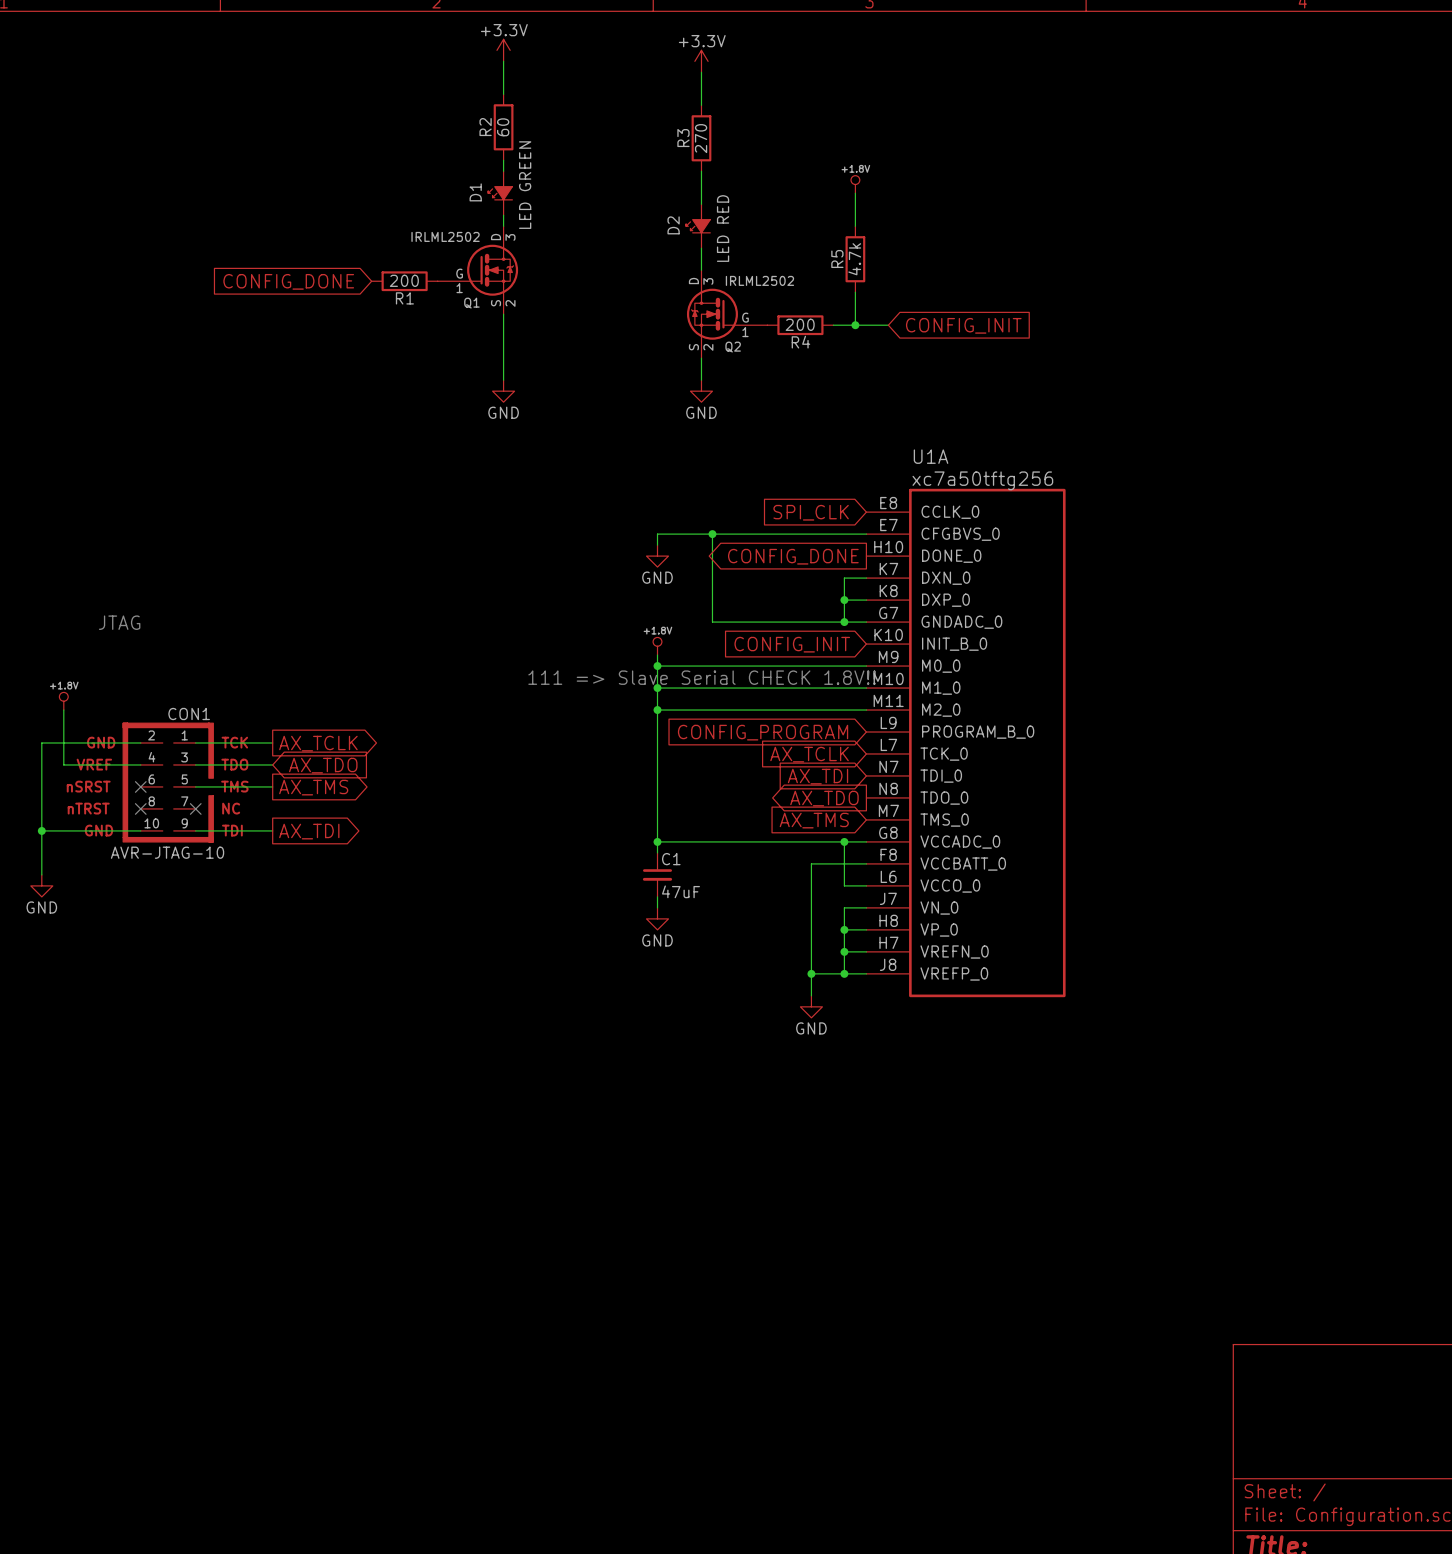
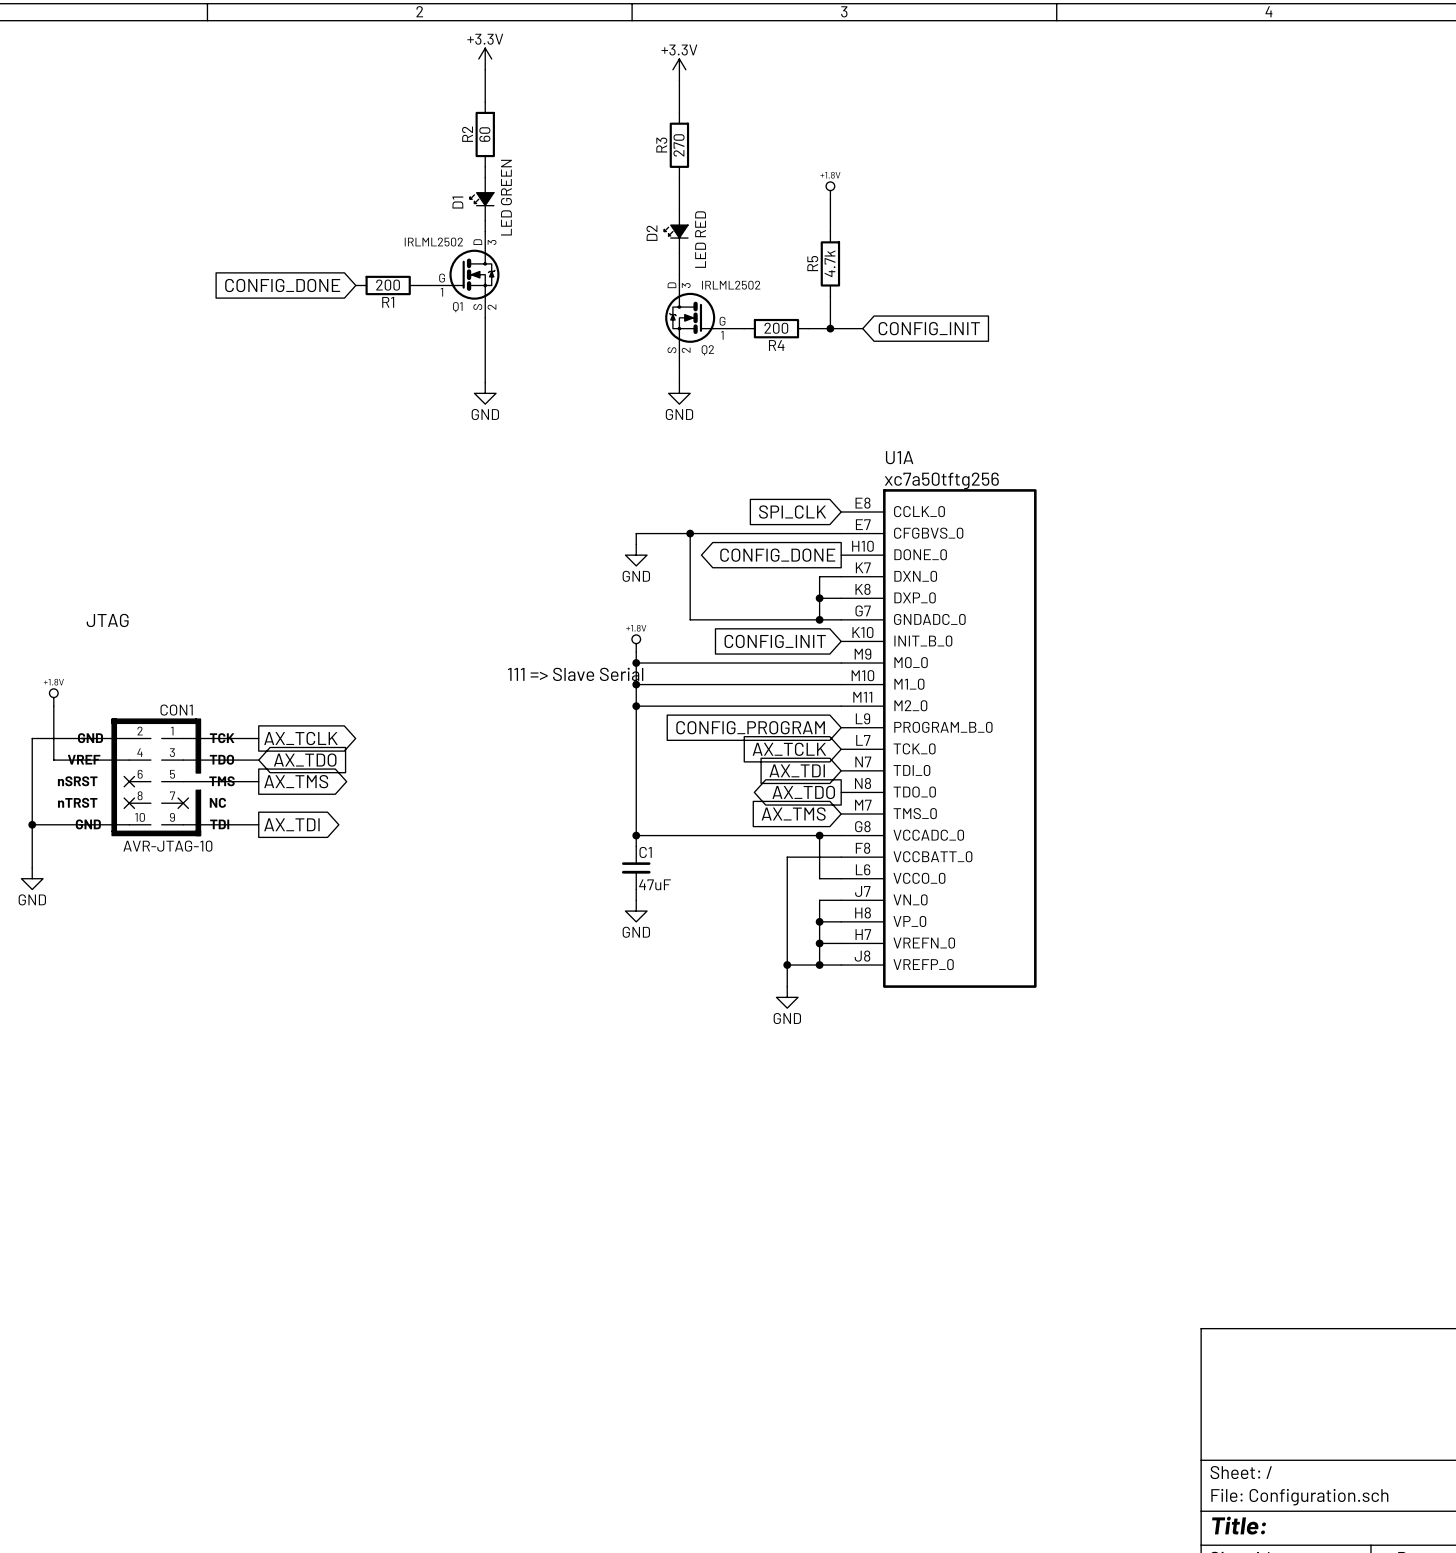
text: 111 => Slave Serial CHECK 1.8V!! (702, 677) -> 111 => Slave Serial (575, 674)

